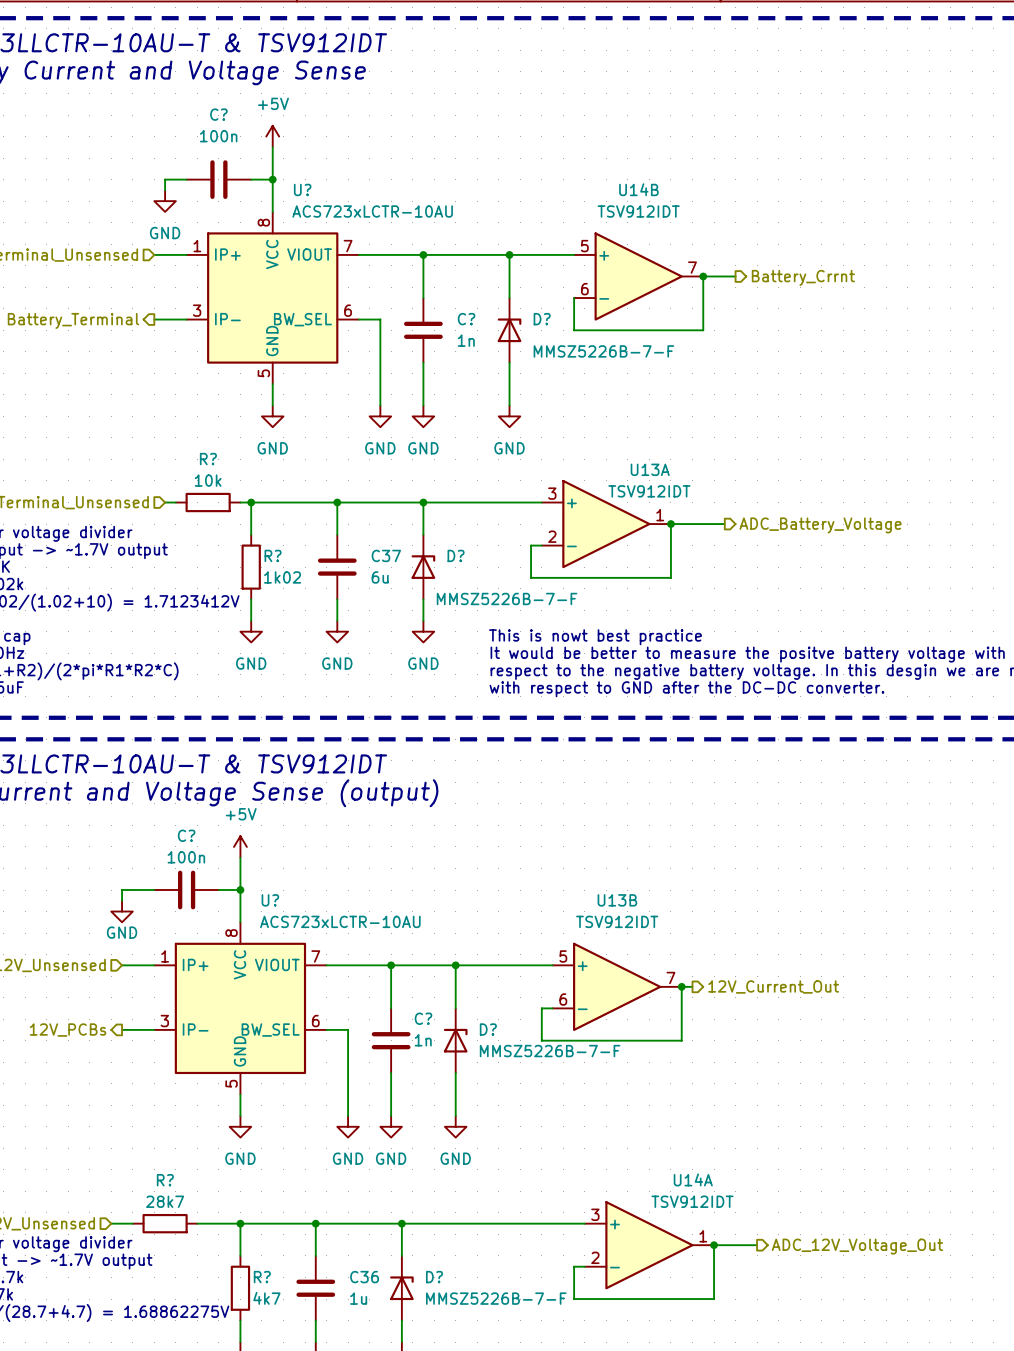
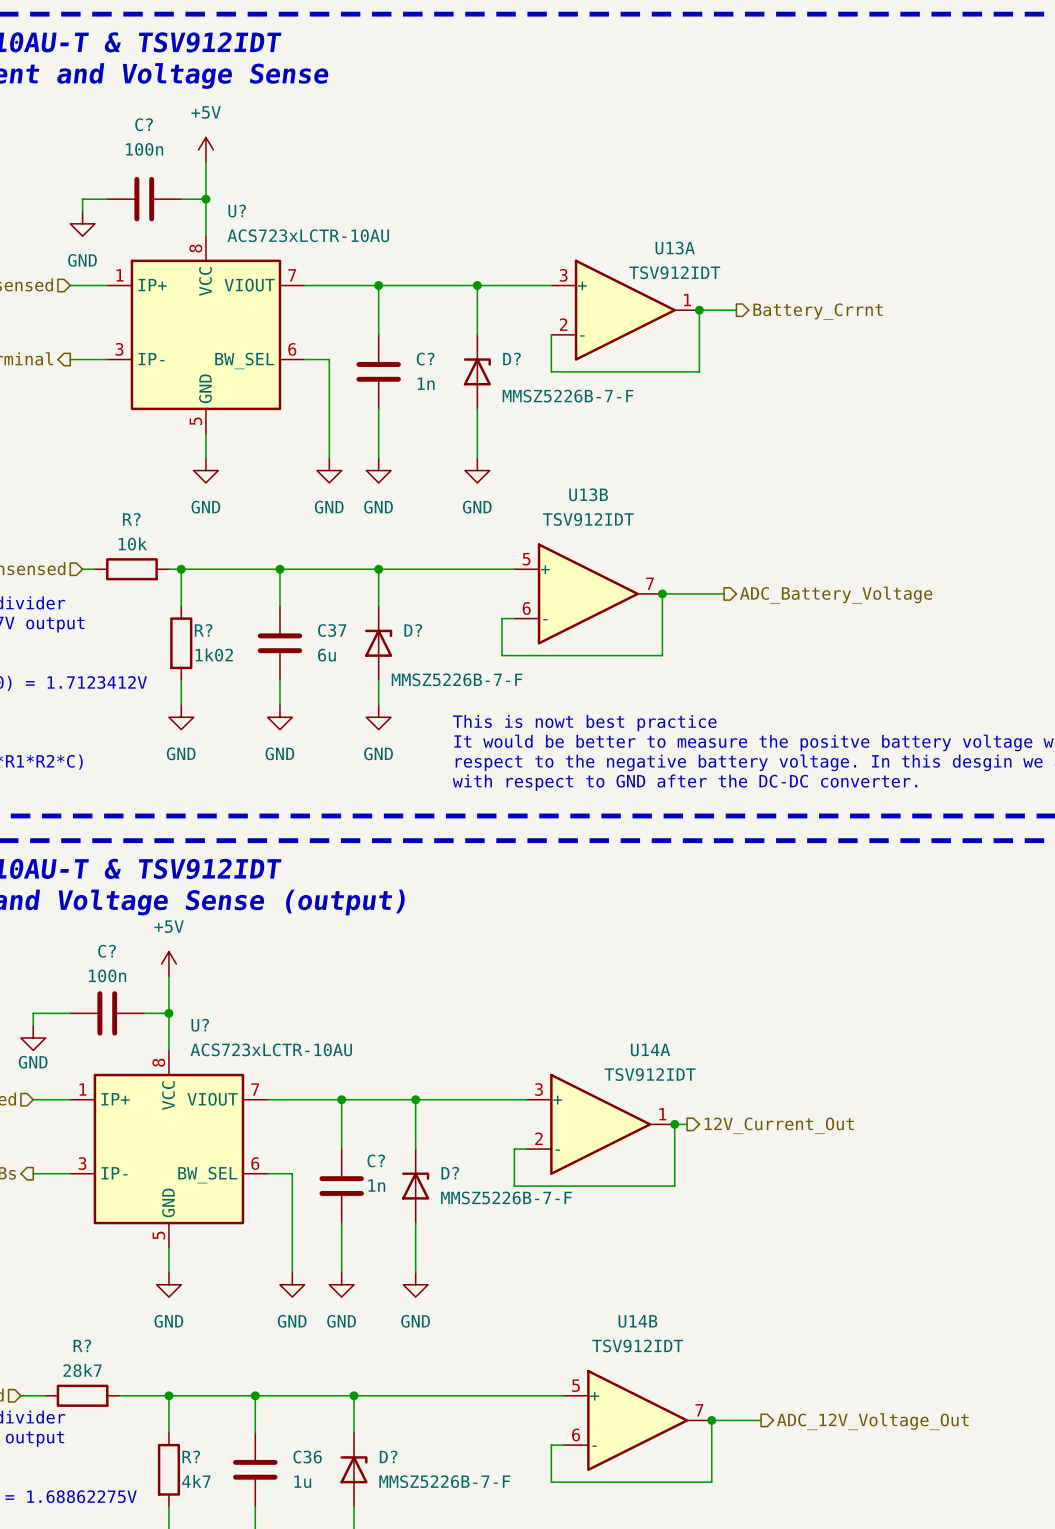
U14B position: (638, 276) -> (637, 1420)
U13A position: (606, 524) -> (625, 310)
U13B position: (617, 986) -> (588, 593)
U14A position: (649, 1245) -> (600, 1124)

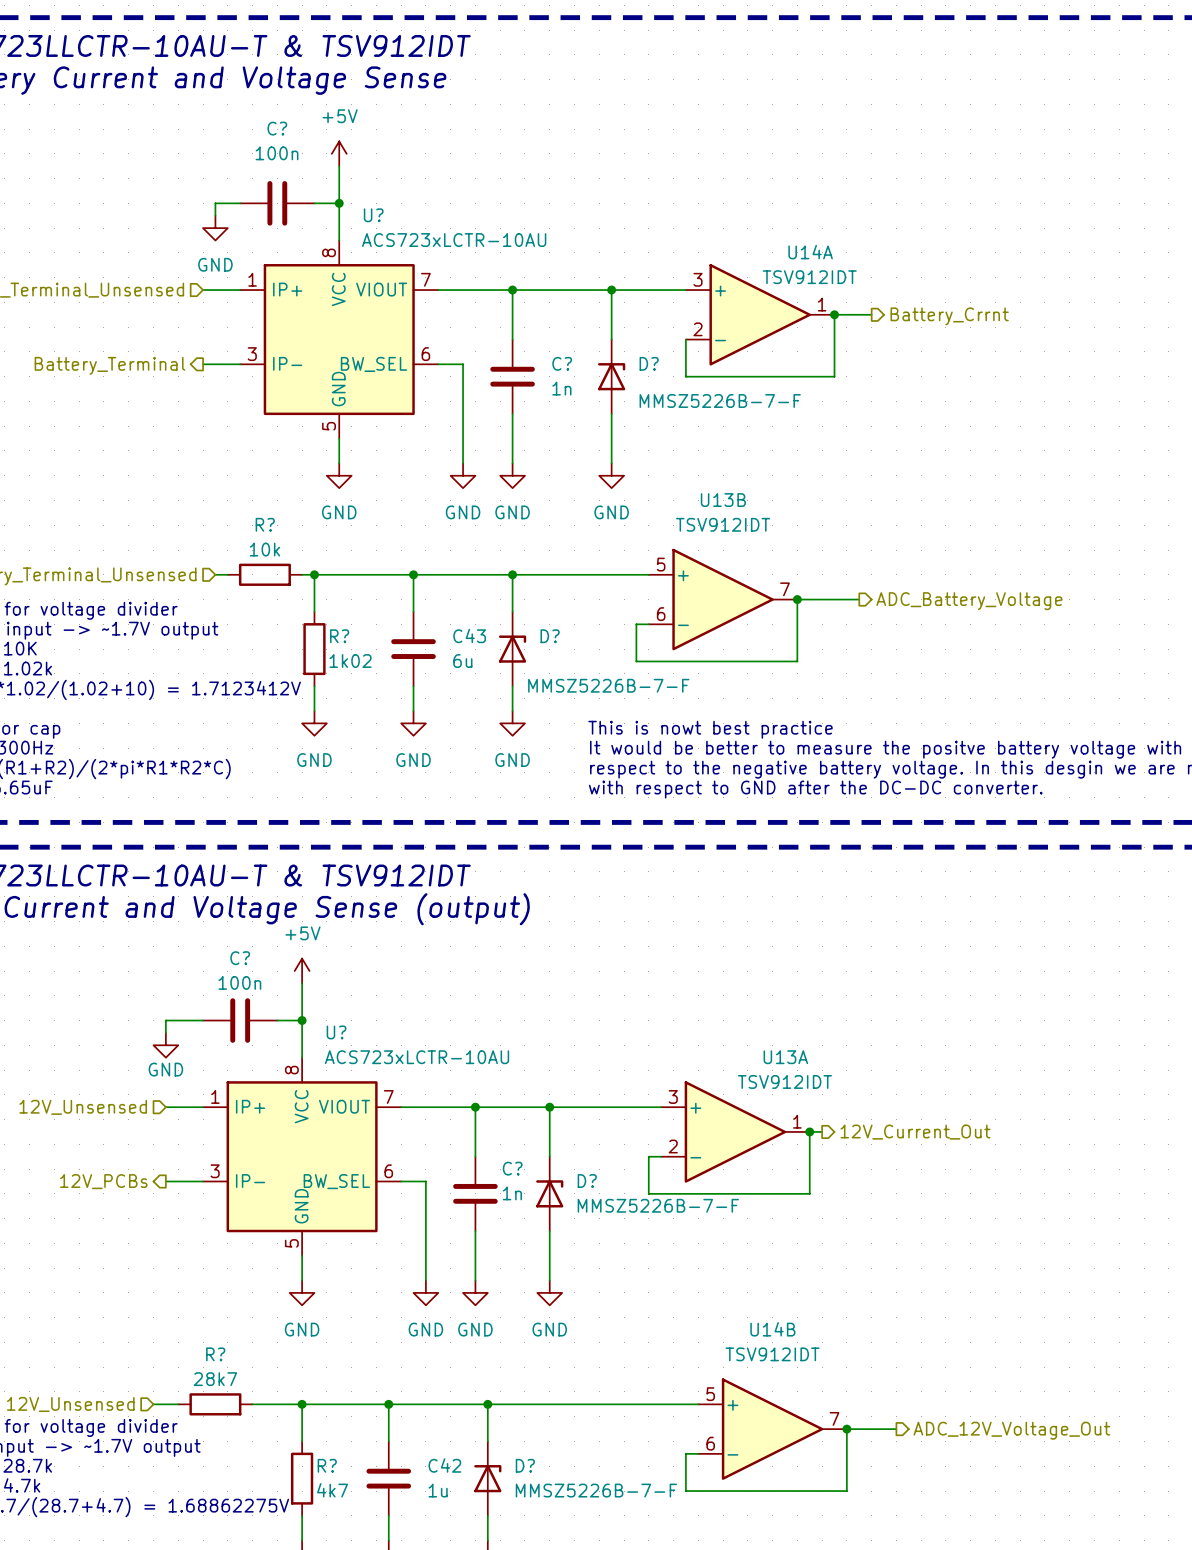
U13A name: U13A (675, 248) -> U14A (810, 252)
C37 name: C37 (332, 630) -> C43 (469, 635)
U14A name: U14A (650, 1050) -> U13A (785, 1057)
C36 name: C36 (307, 1457) -> C42 (444, 1465)

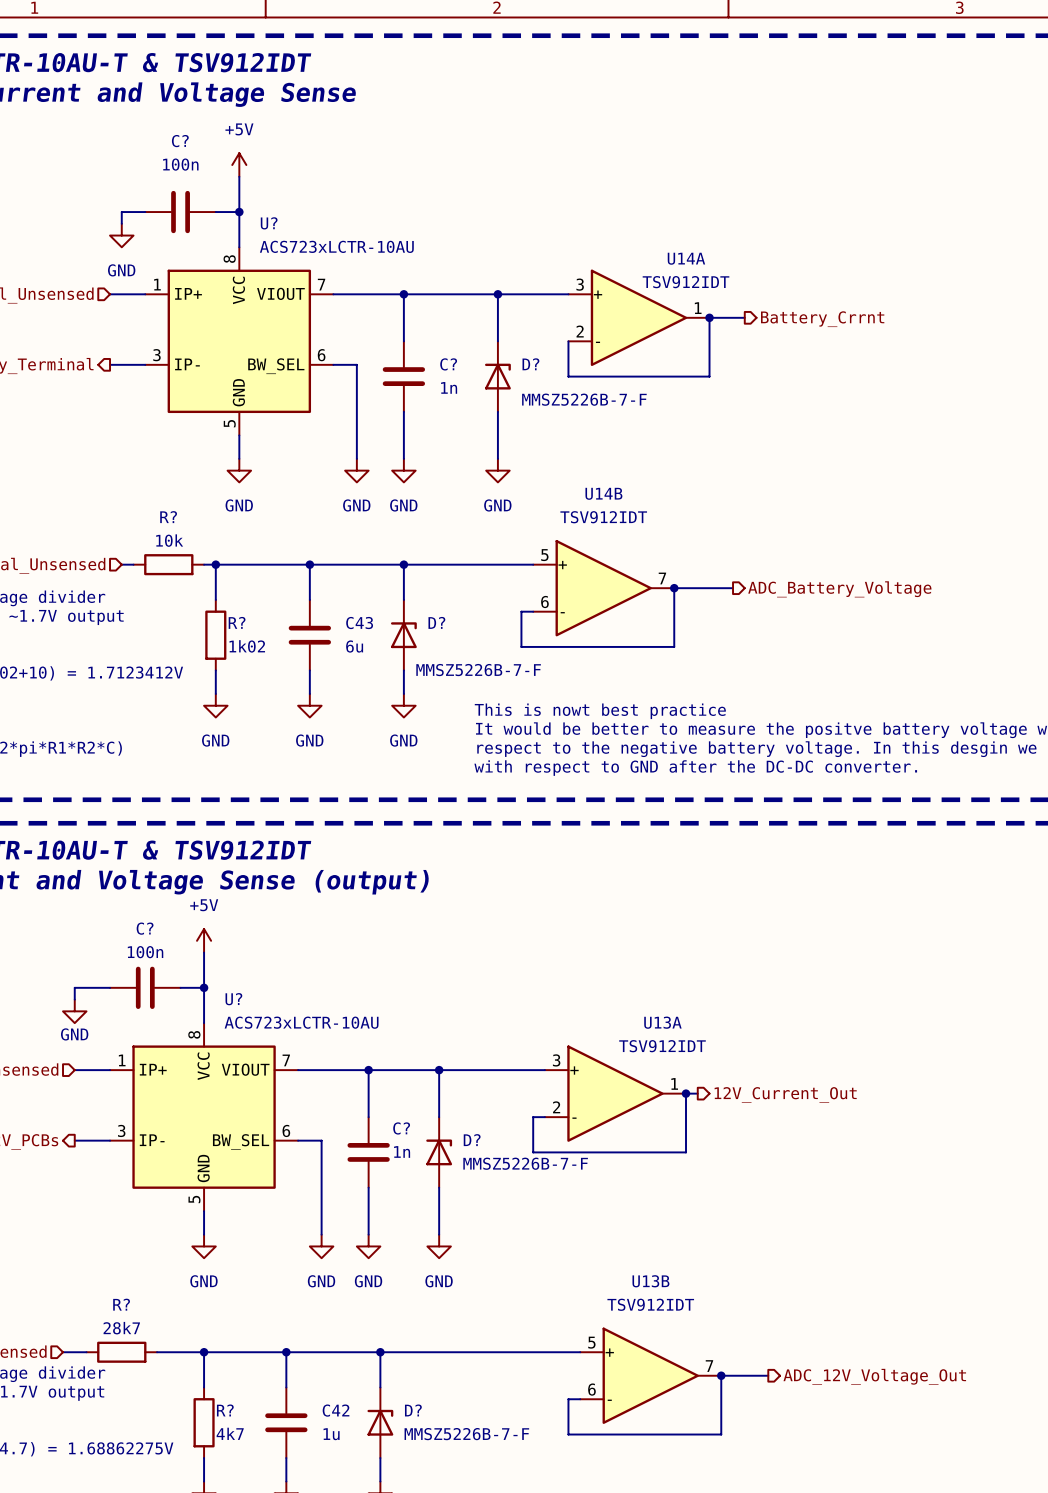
U13B name: U13B (723, 500) -> U14B (603, 493)
U14B name: U14B (772, 1329) -> U13B (650, 1281)

